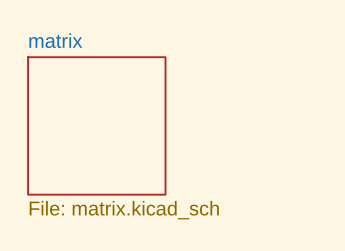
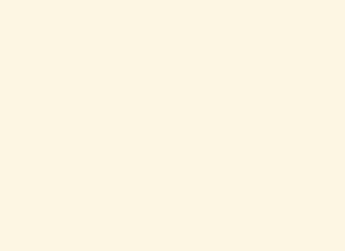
sheet matrix: File: matrix.kicad_sch (96, 125) -> none

